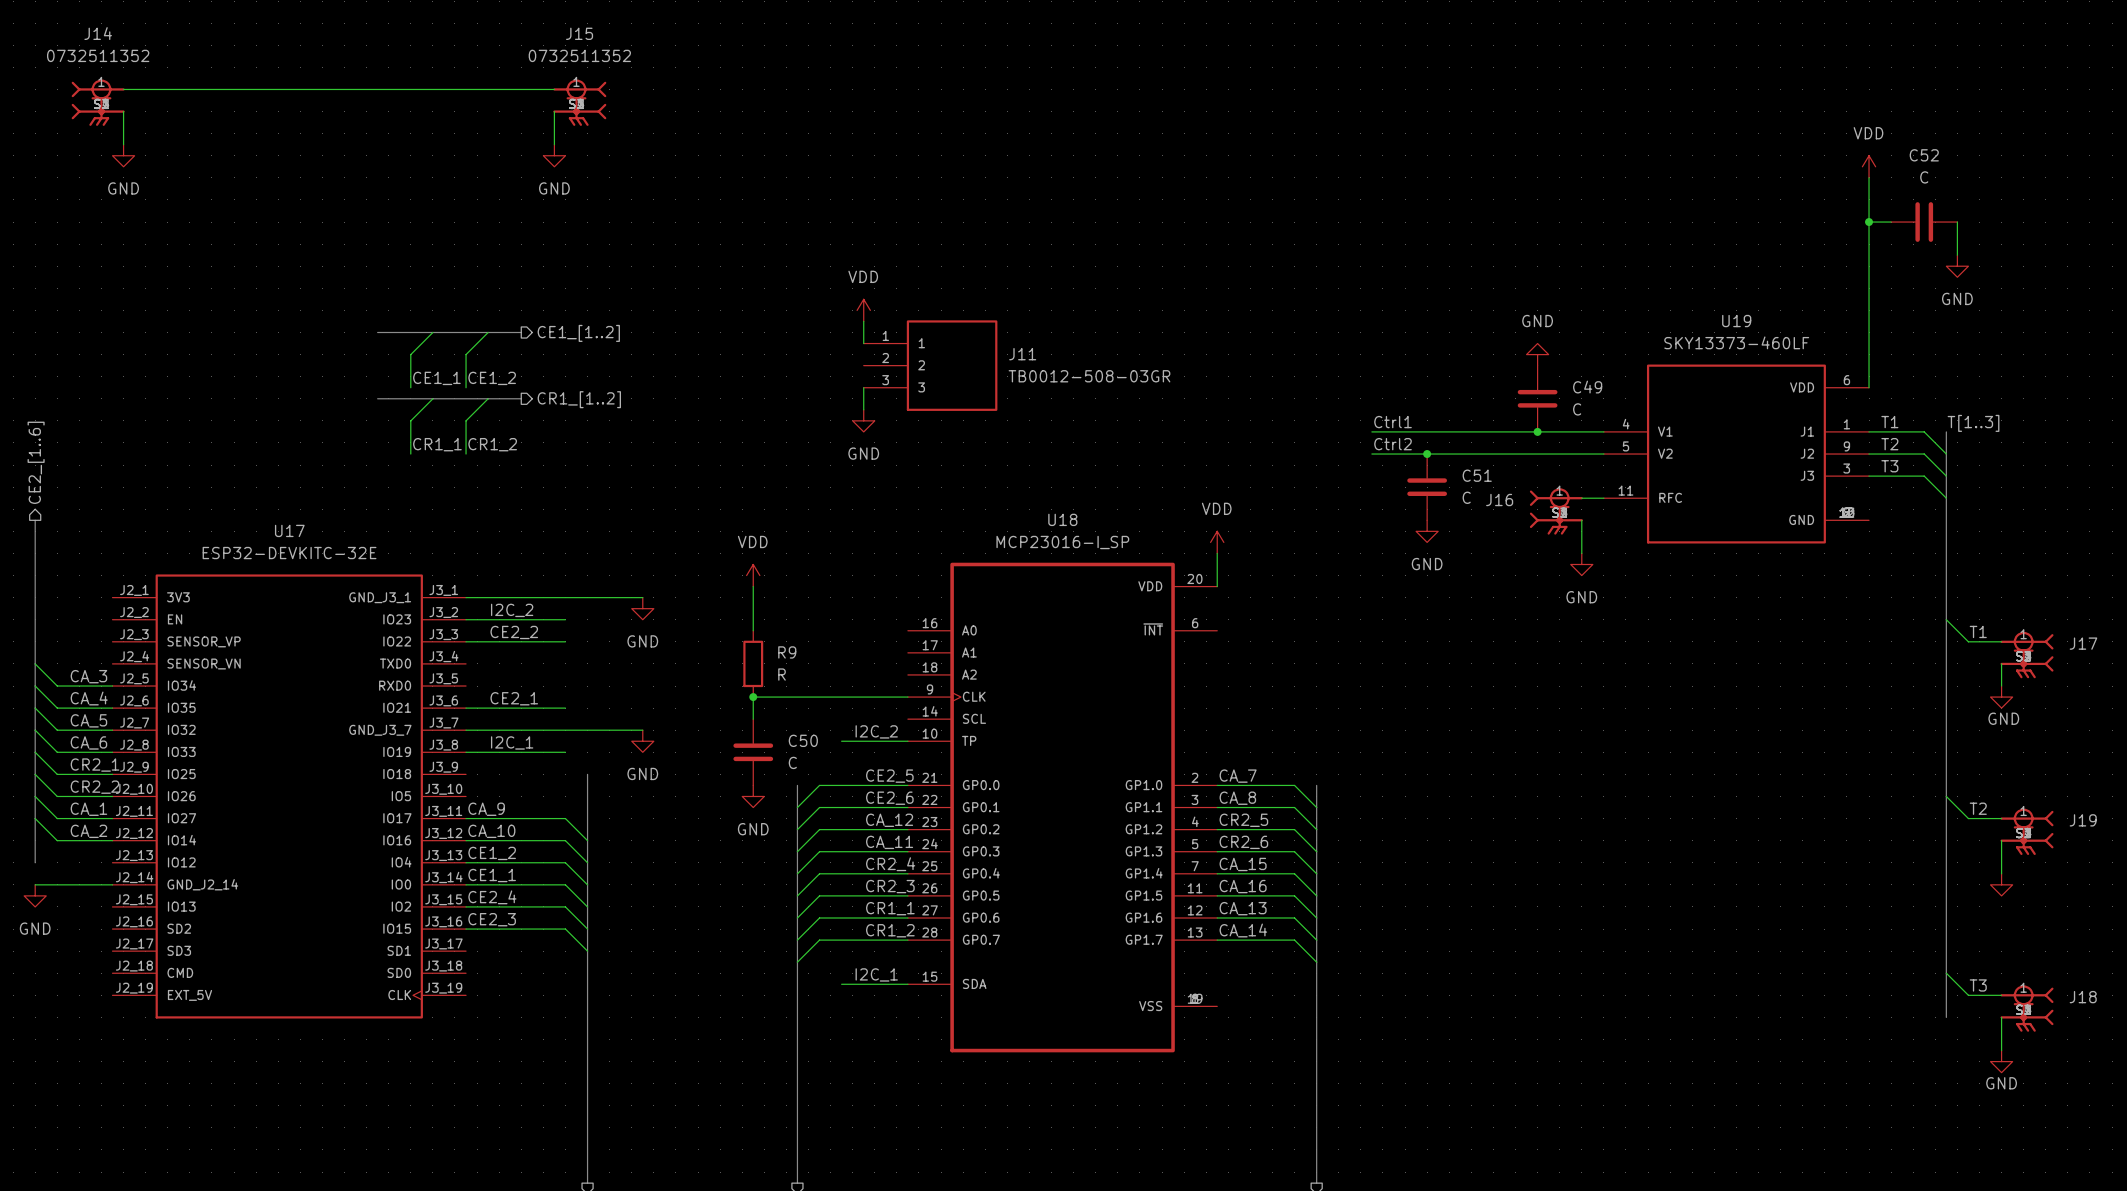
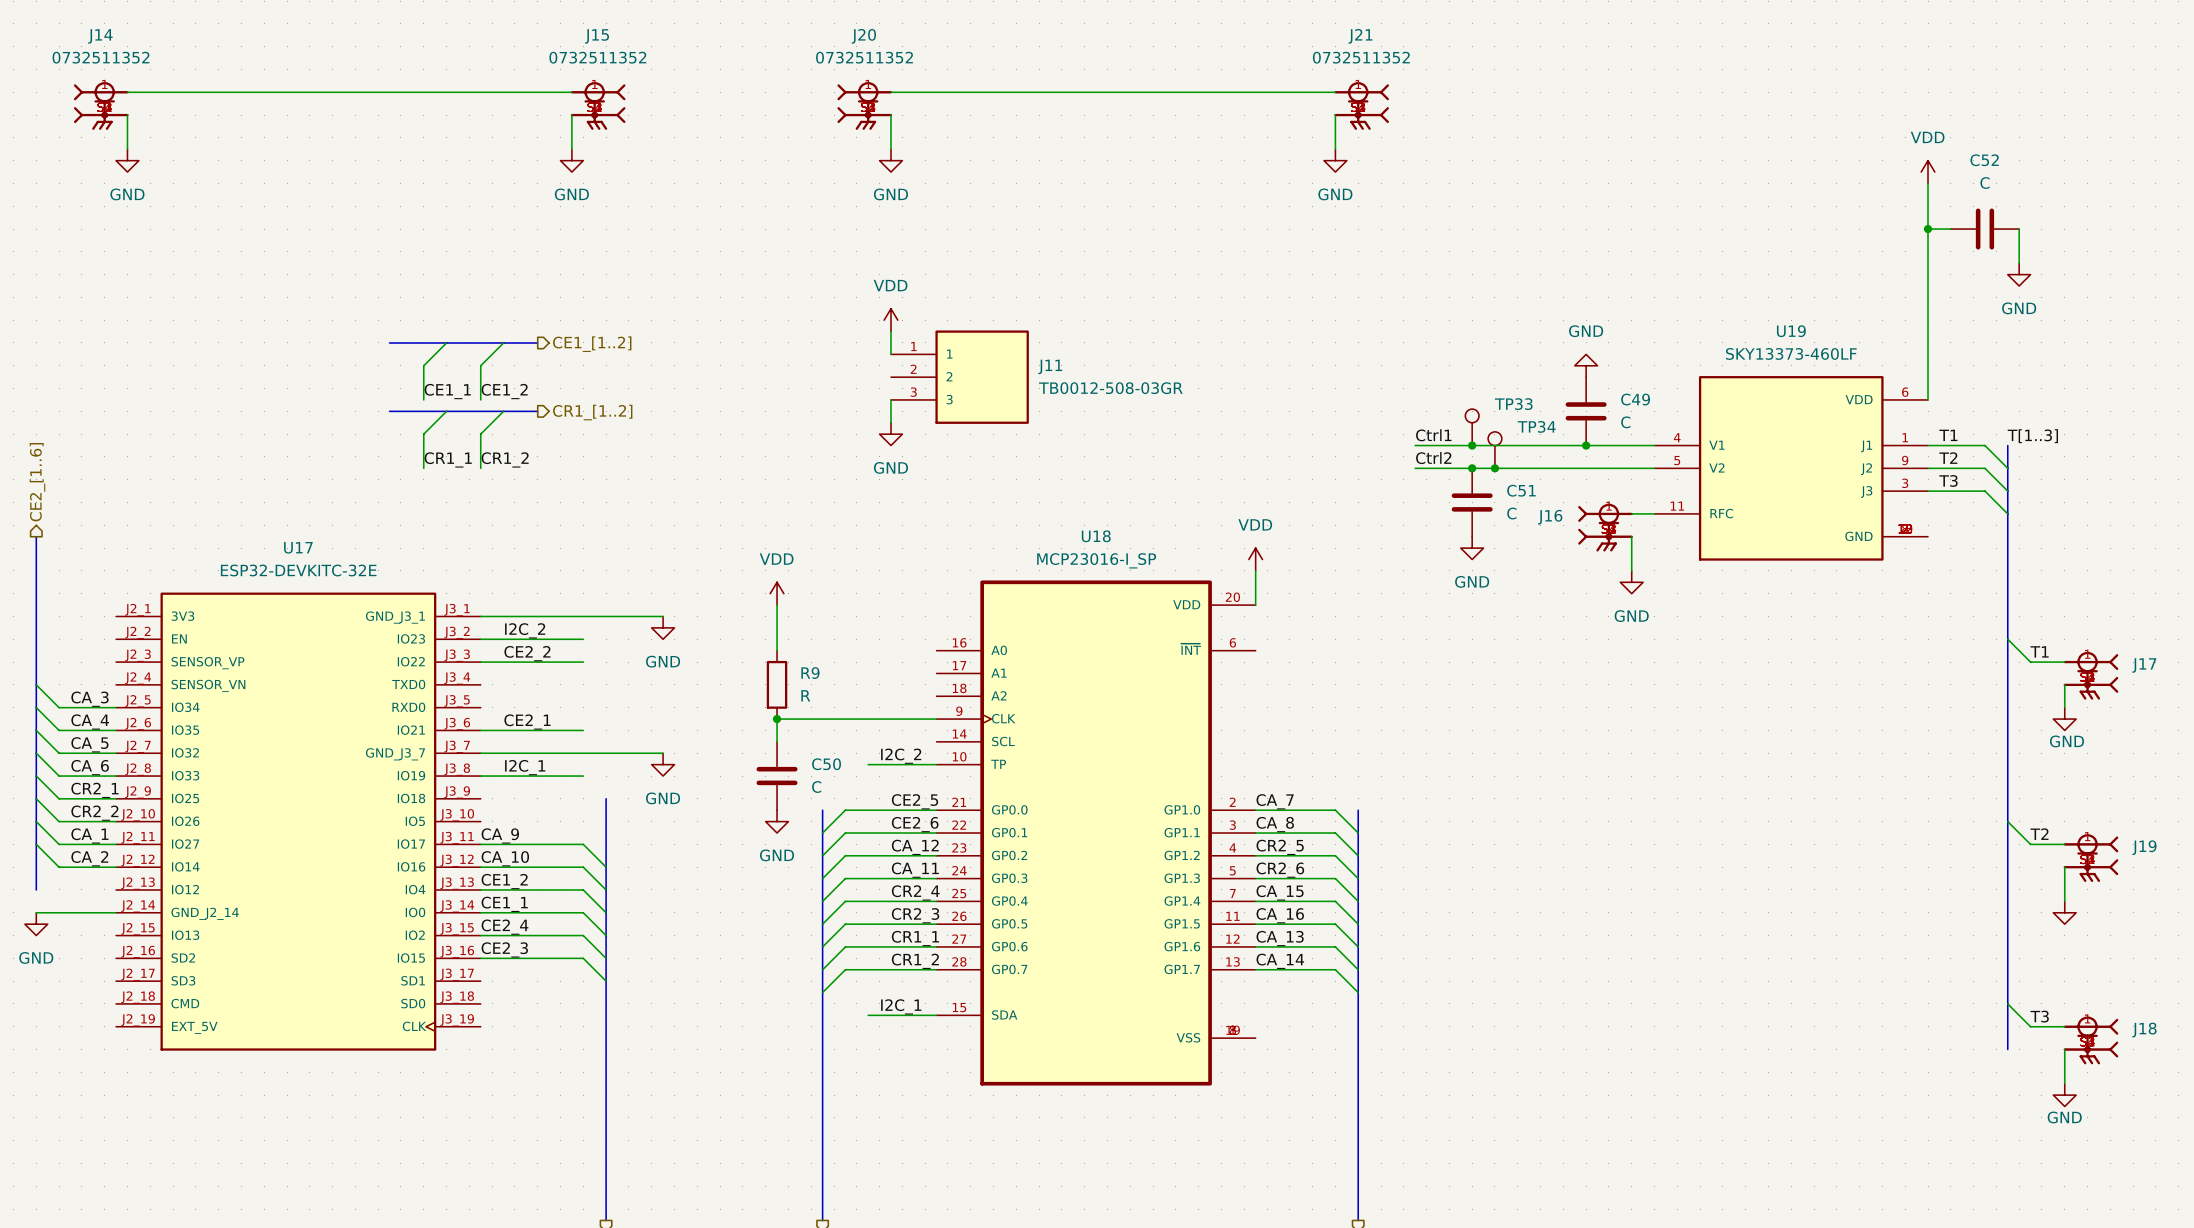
wire: none -> (890, 92) (1335, 92)
J20: none -> 0732511352 (864, 105)
J21: none -> 0732511352 (1361, 105)
wire: none -> (890, 115) (890, 149)
wire: none -> (1335, 115) (1335, 149)
power symbol: none -> GND (890, 160)
power symbol: none -> GND (1335, 160)
TP33: none -> (1472, 427)
junction: none -> (1472, 445)
TP34: none -> (1494, 450)
junction: none -> (1494, 468)

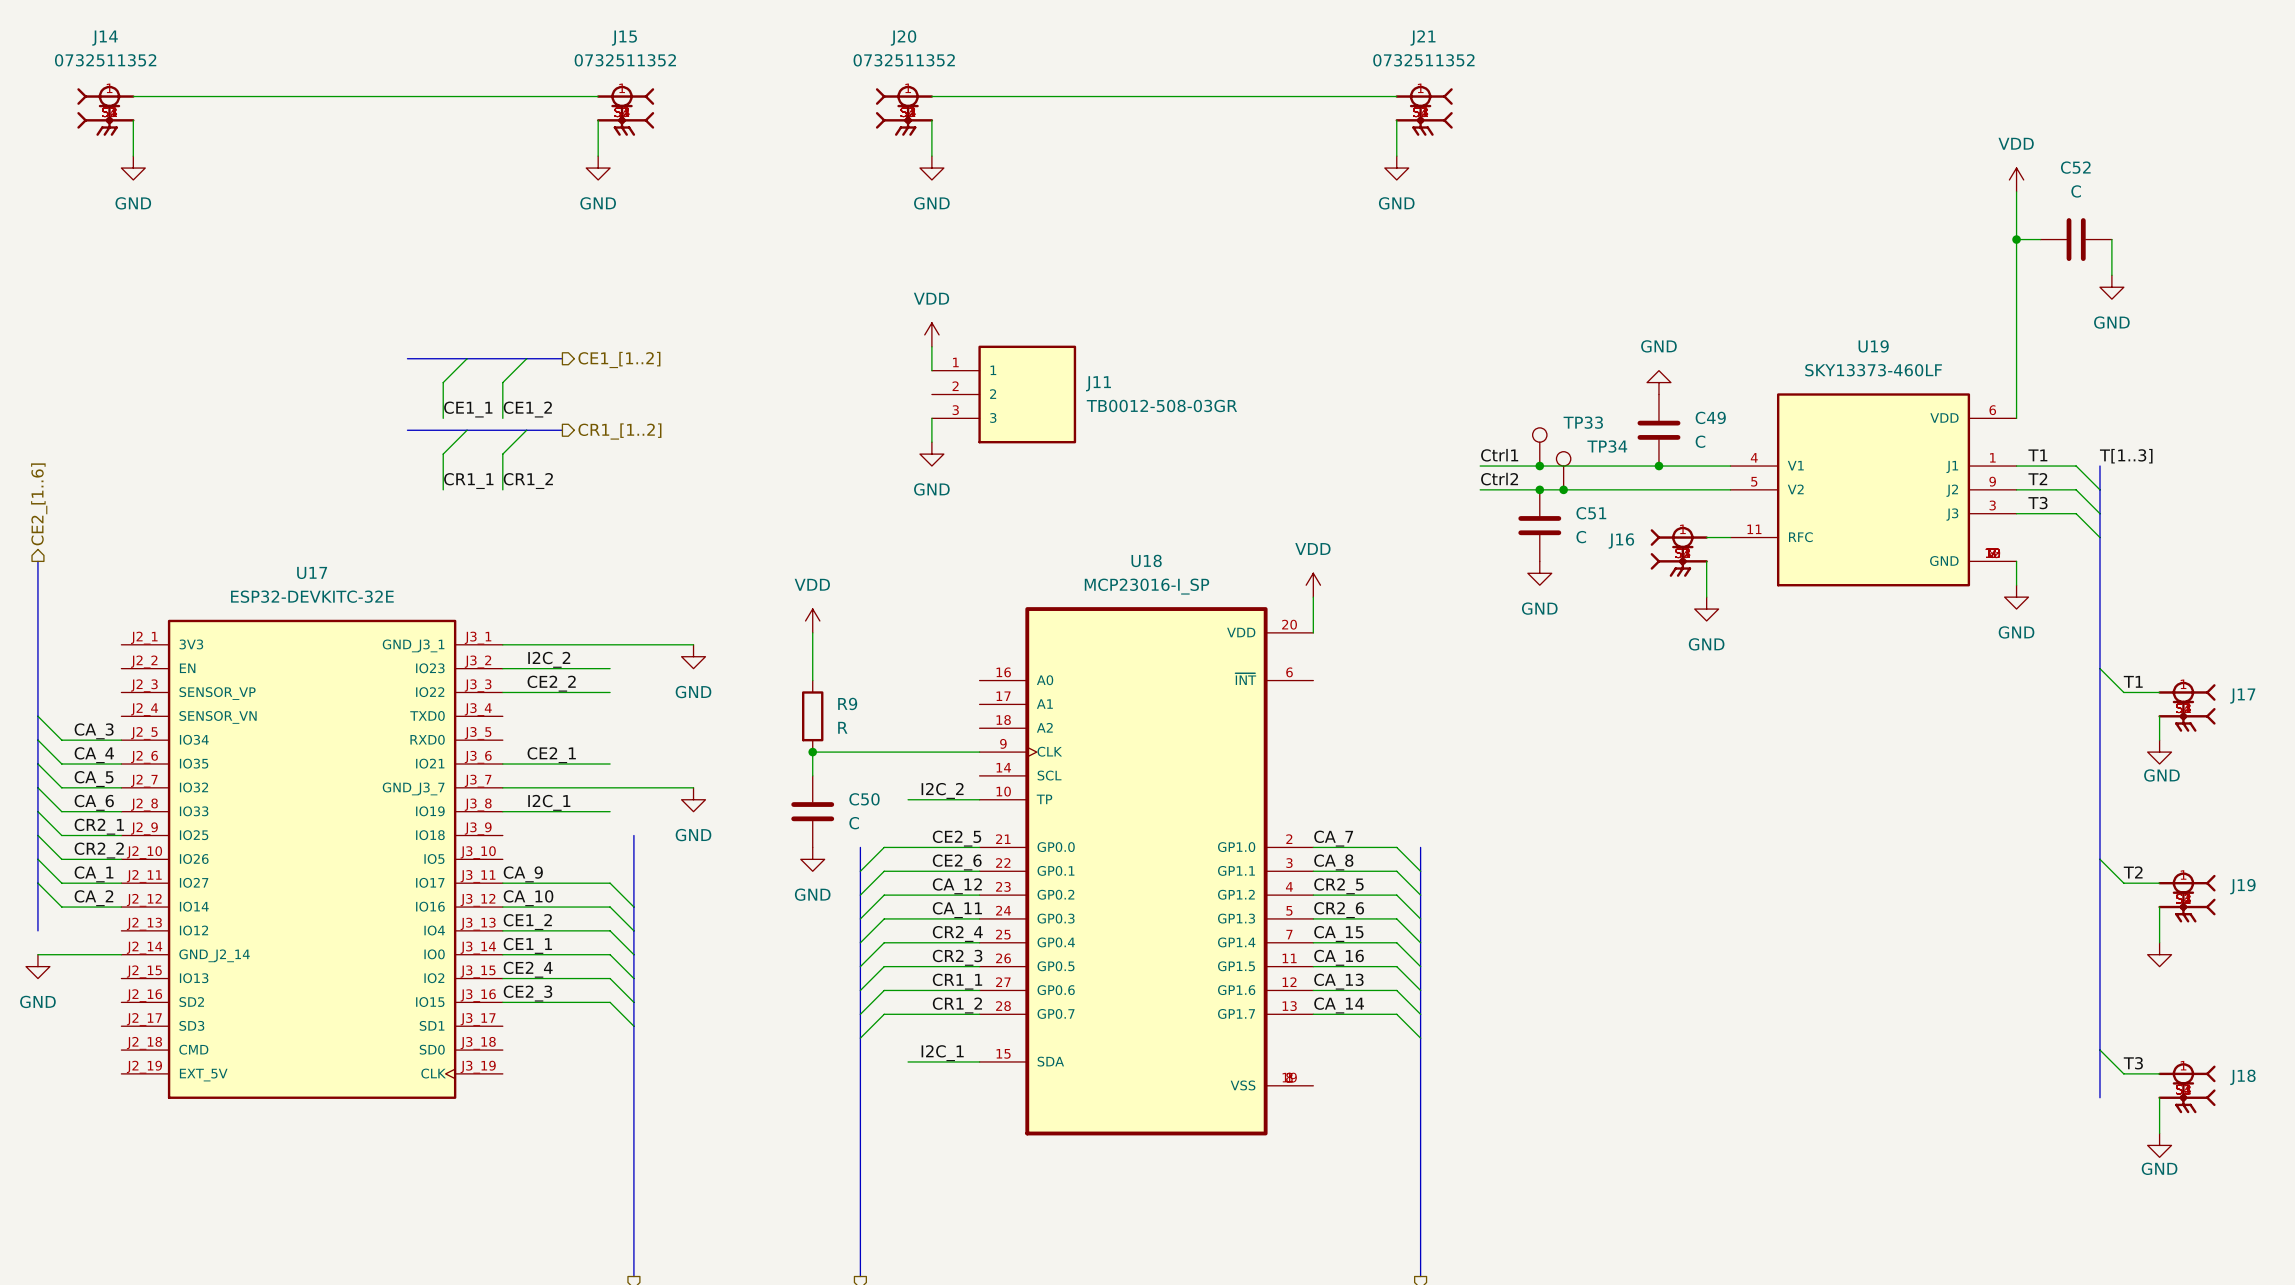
wire: none -> (2016, 561) (2016, 585)
power symbol: none -> GND (2016, 597)

